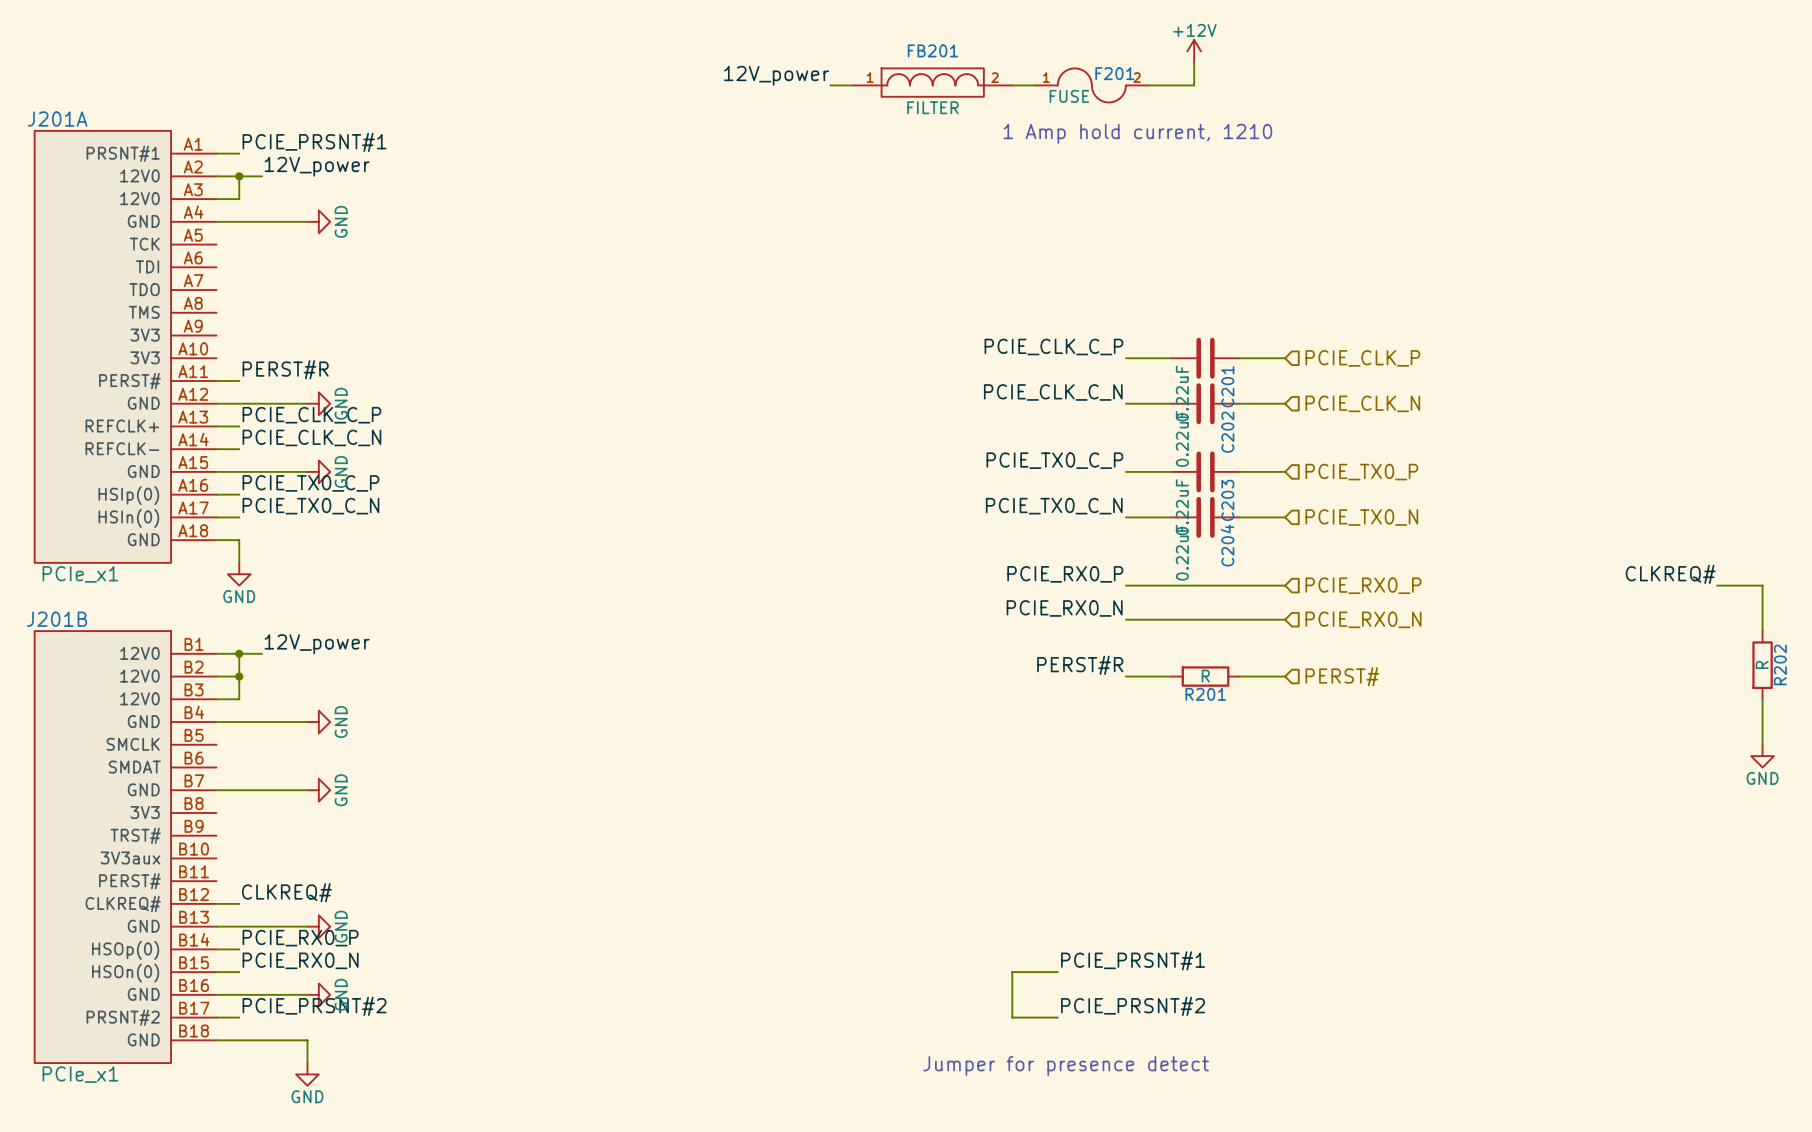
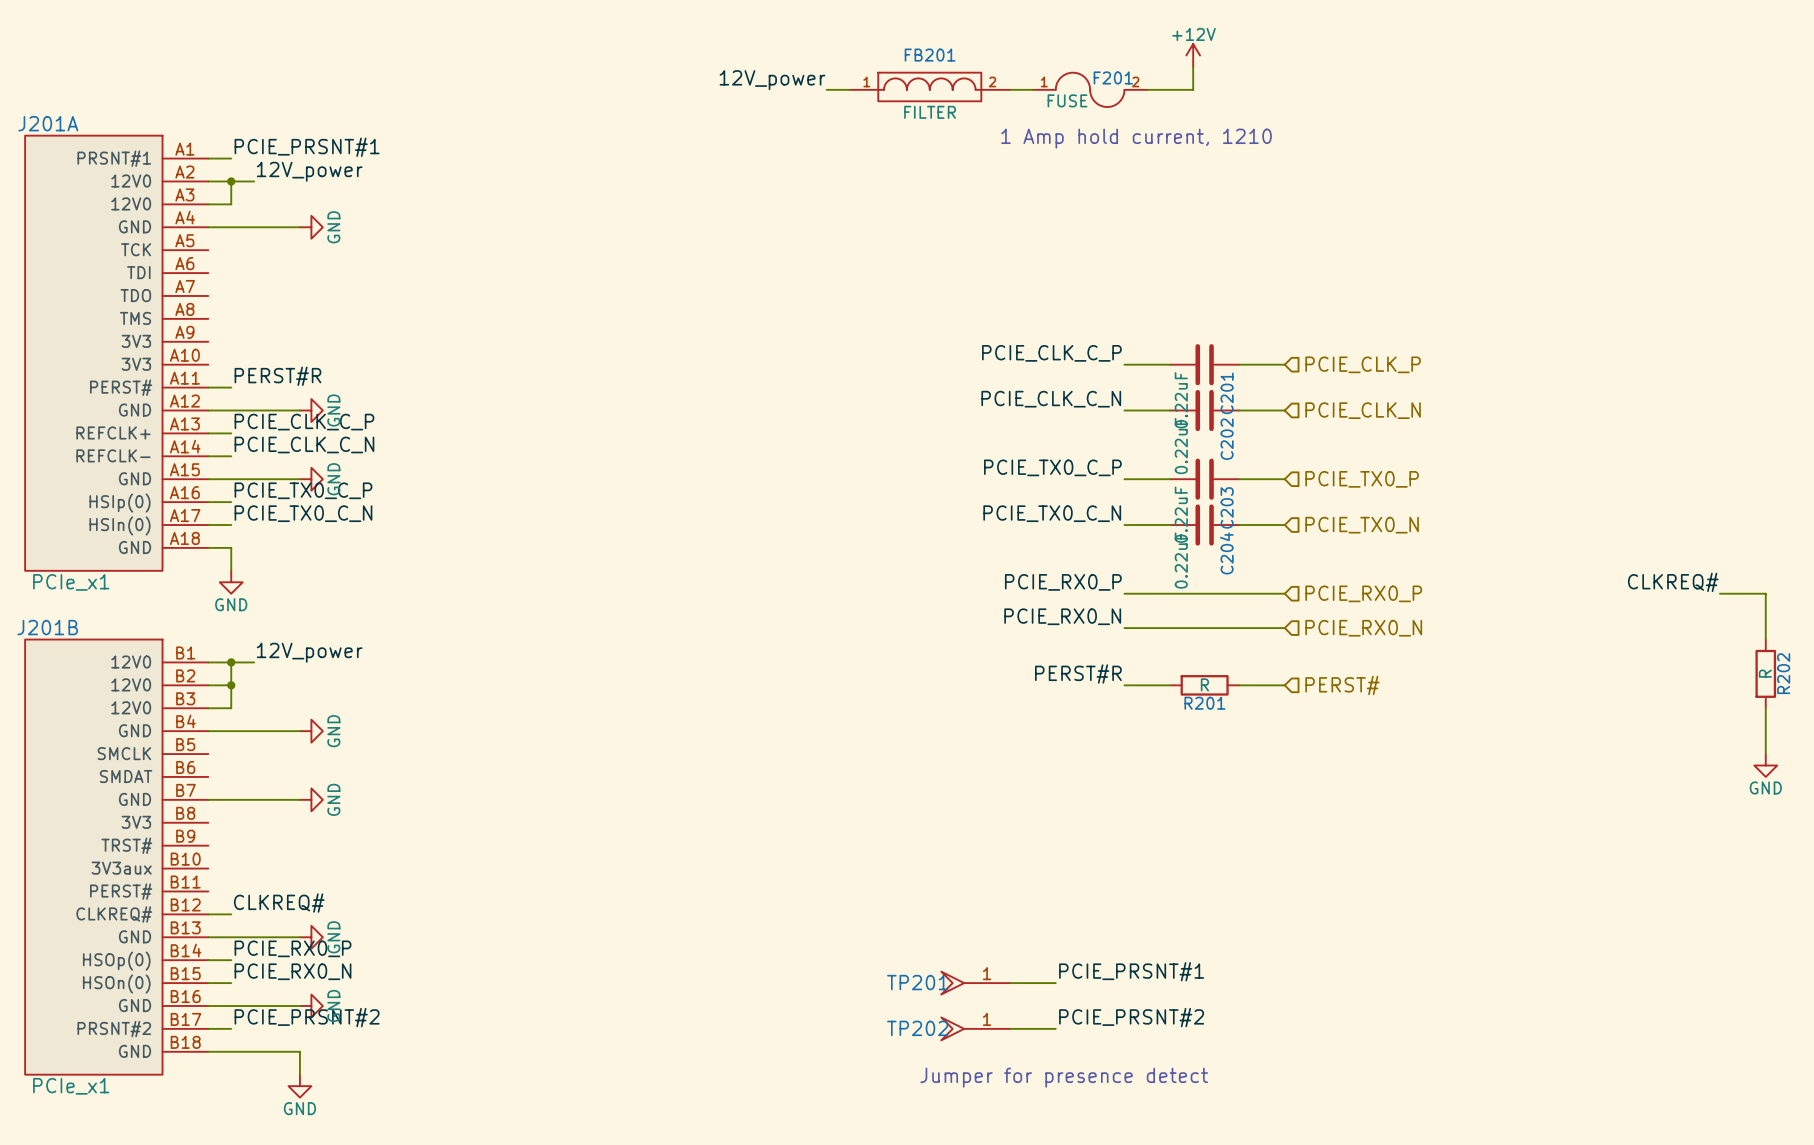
TP201: none -> (975, 983)
wire: (1012, 972) (1012, 1017) -> none
TP202: none -> (975, 1028)

